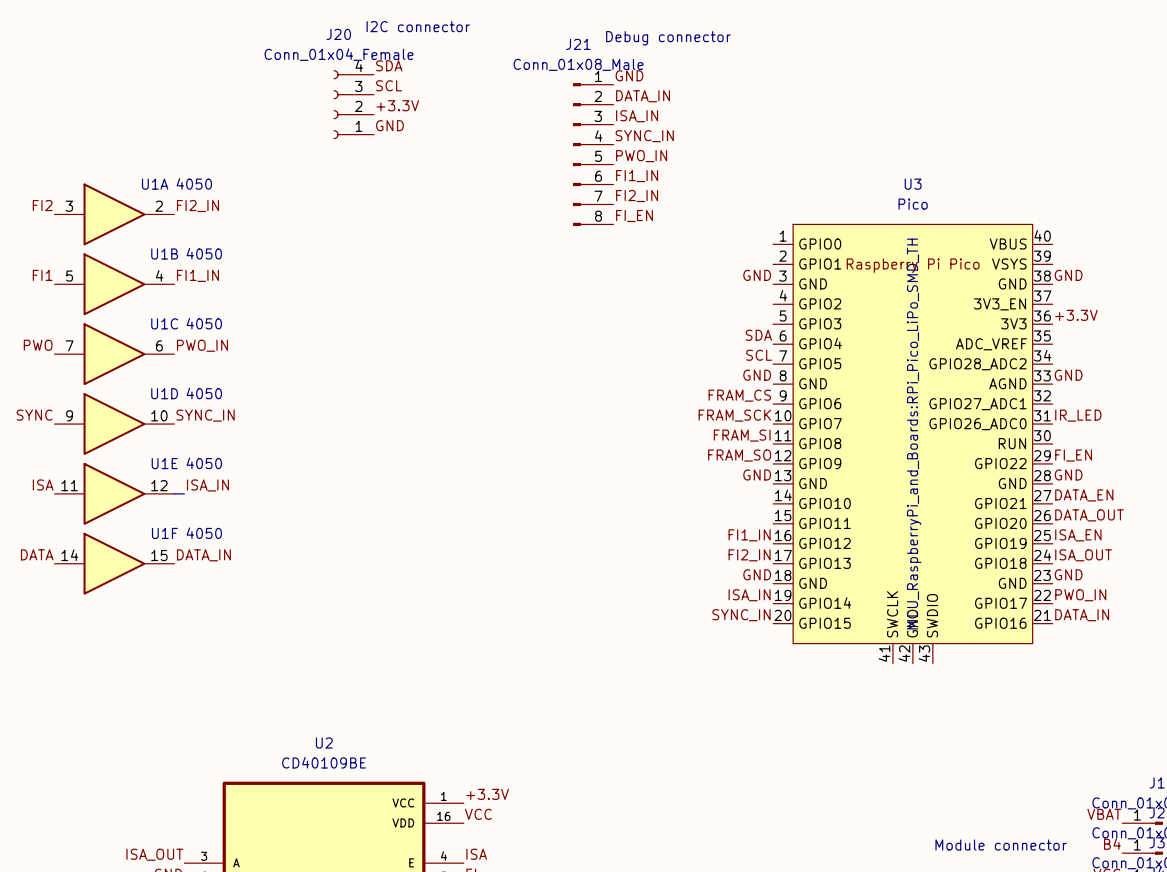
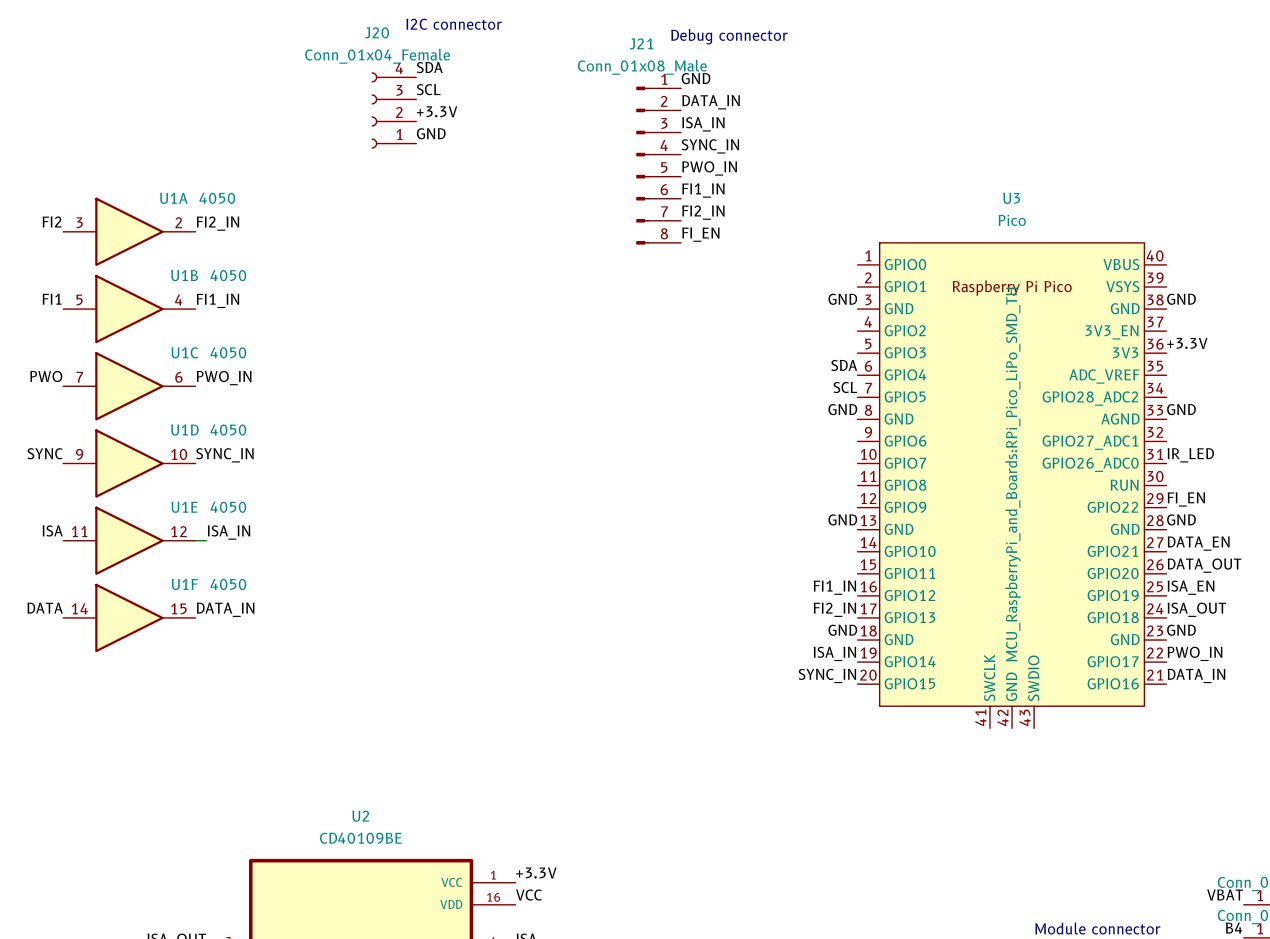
label: FRAM_CS (739, 395) -> none
label: FRAM_SCK (734, 415) -> none
label: FRAM_SI (742, 435) -> none
label: FRAM_SO (739, 455) -> none

